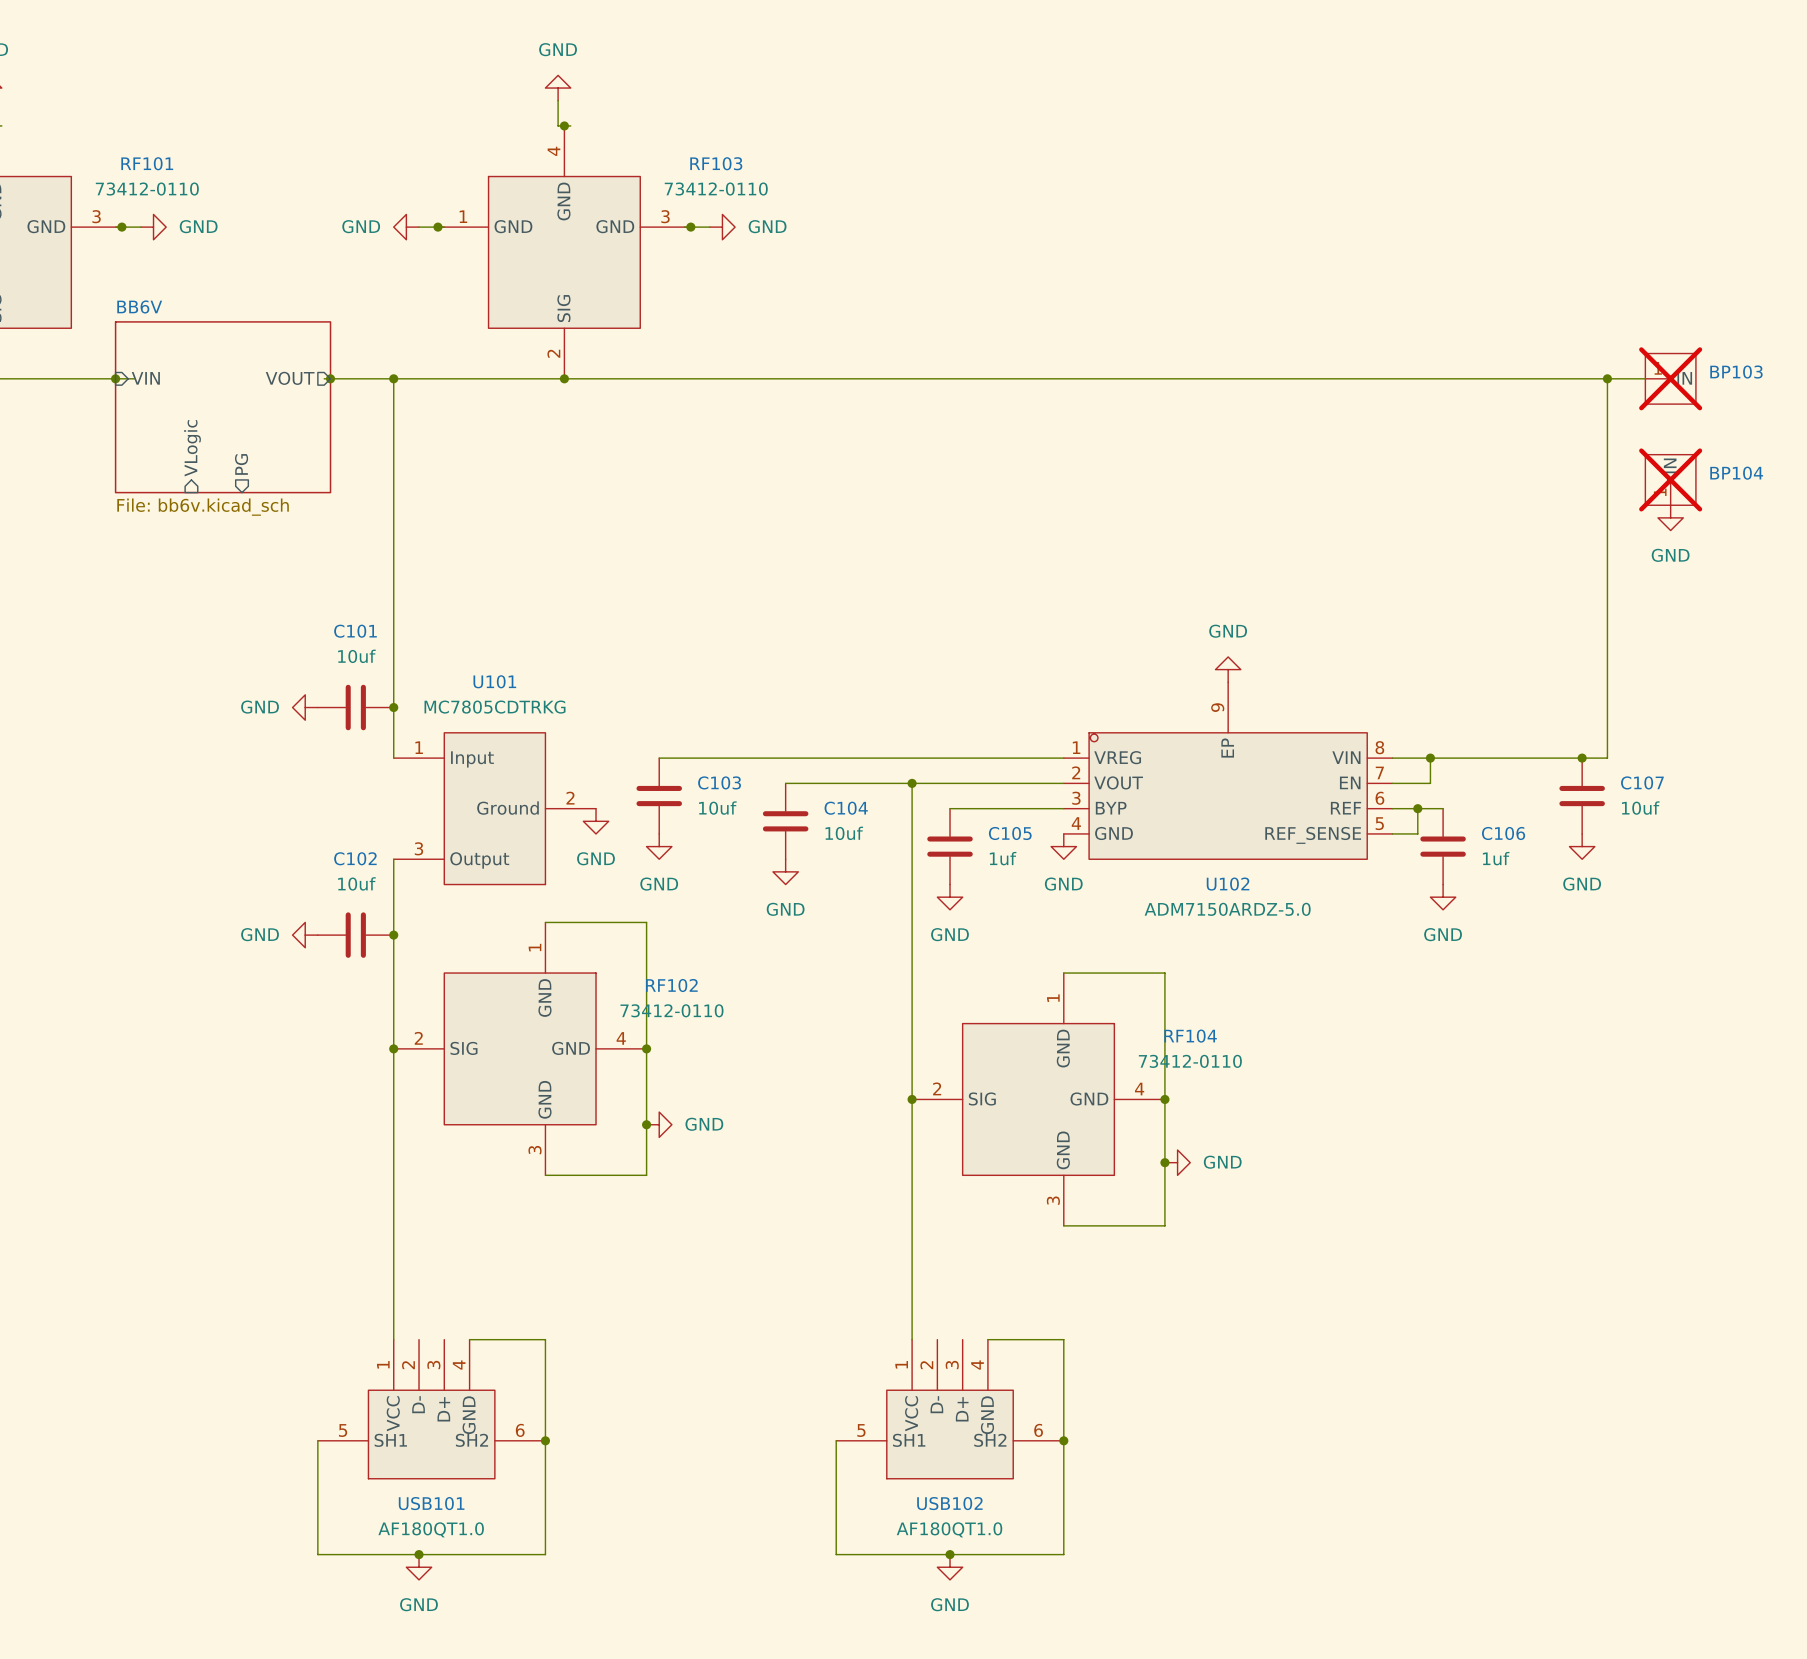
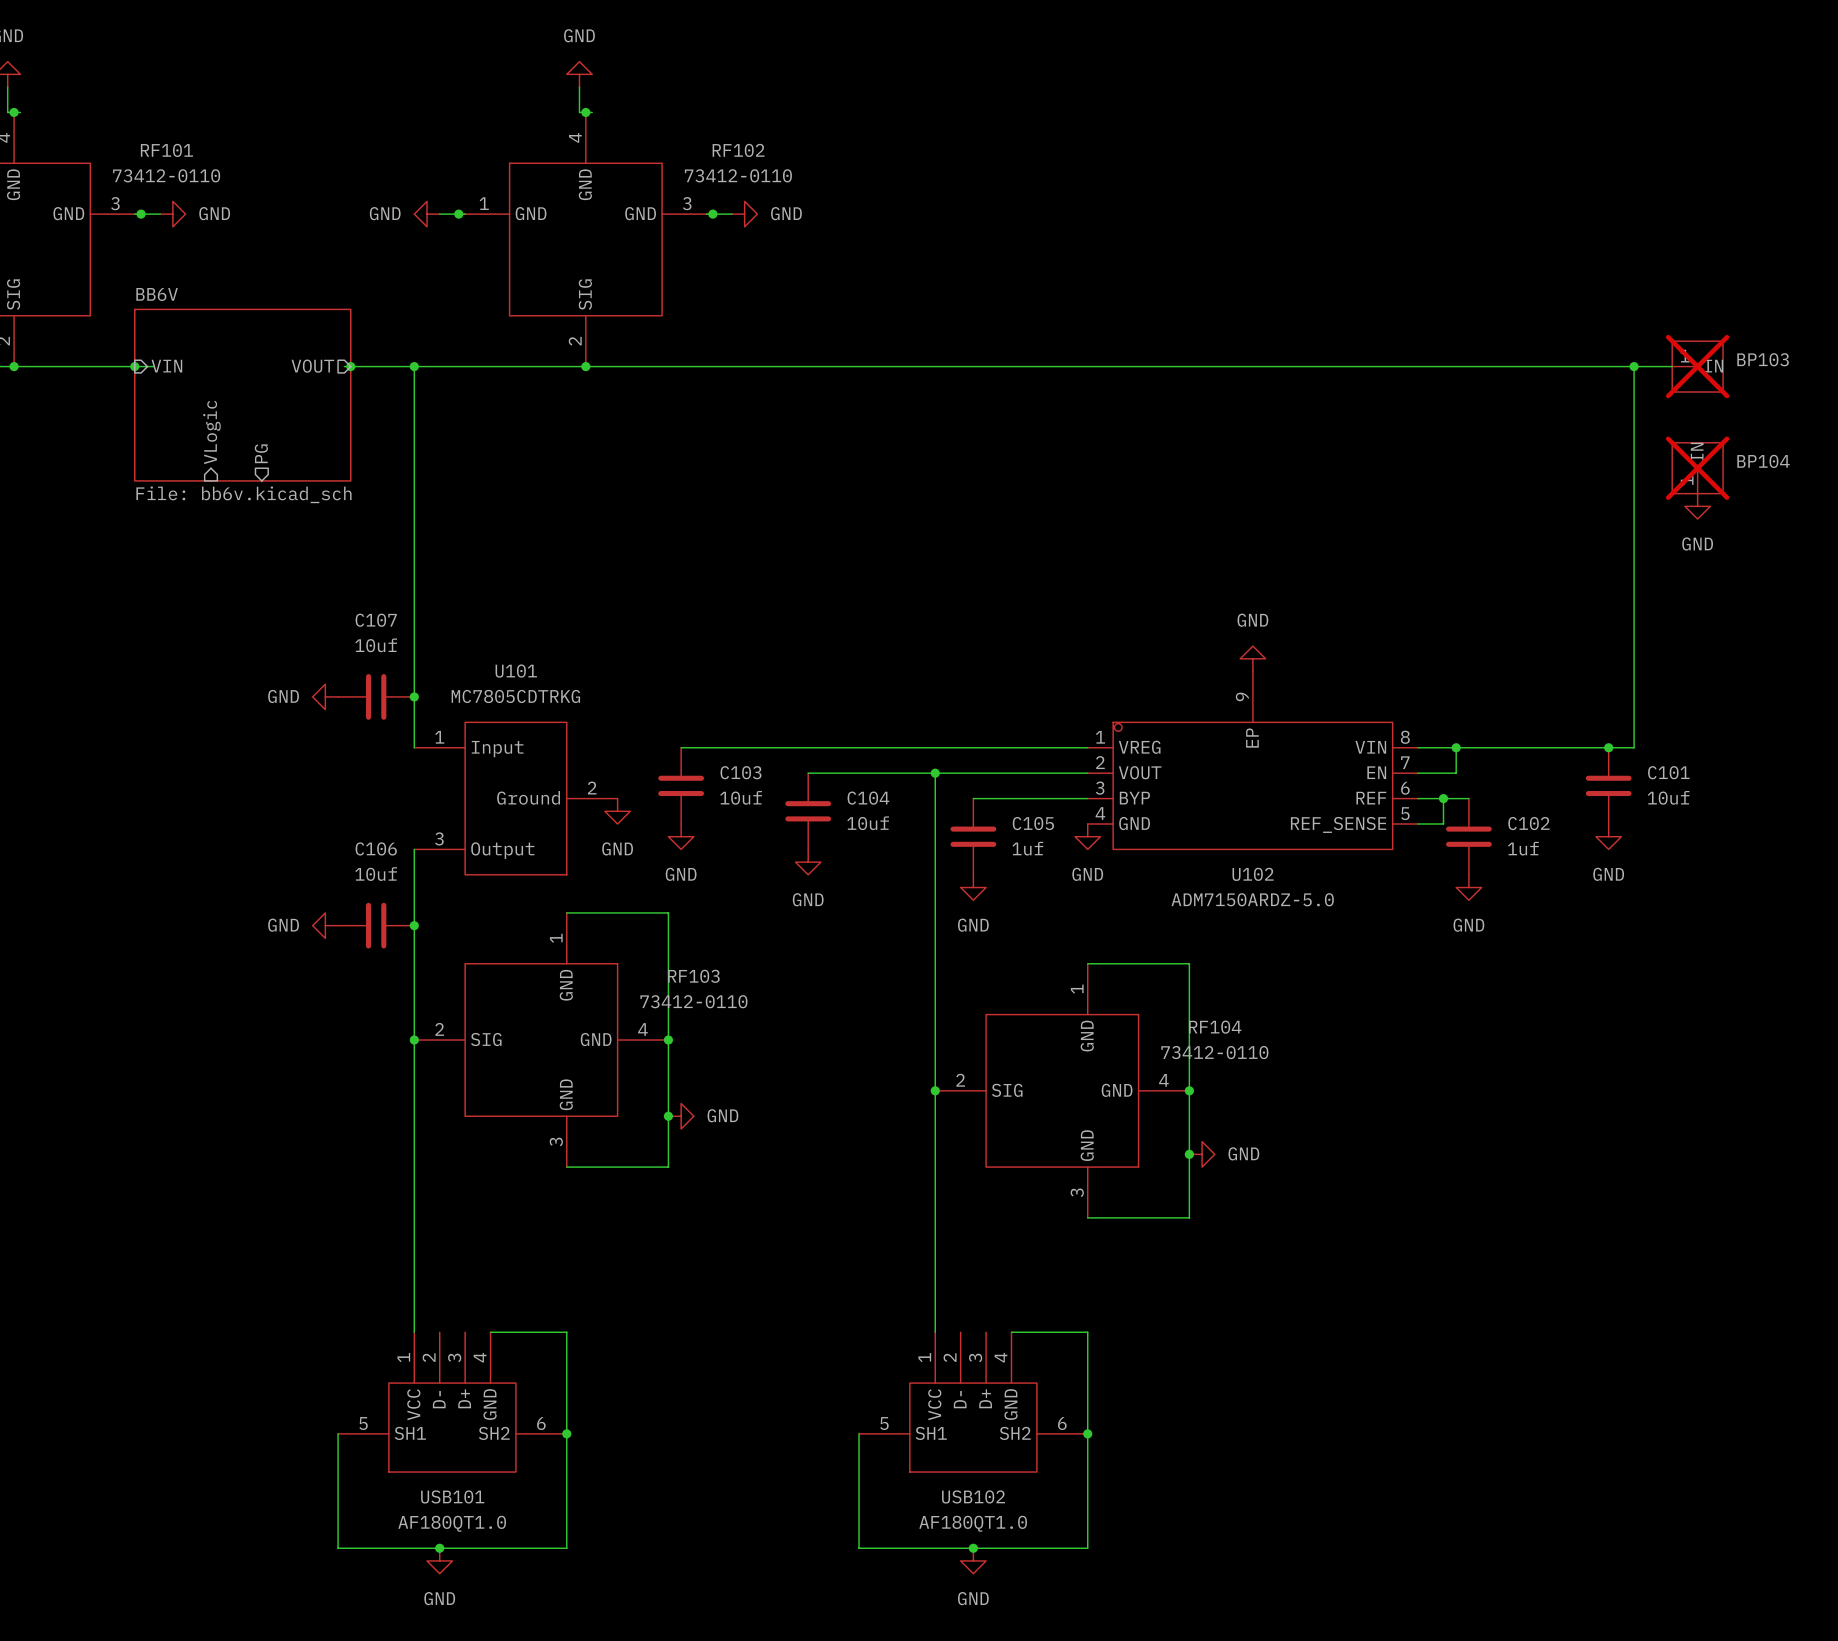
RF103 name: RF103 (716, 163) -> RF102 (738, 150)
C101 name: C101 (355, 631) -> C107 (376, 620)
C107 name: C107 (1642, 782) -> C101 (1668, 772)
C106 name: C106 (1503, 833) -> C102 (1528, 823)
C102 name: C102 (355, 858) -> C106 (376, 848)
RF102 name: RF102 (671, 985) -> RF103 (693, 976)

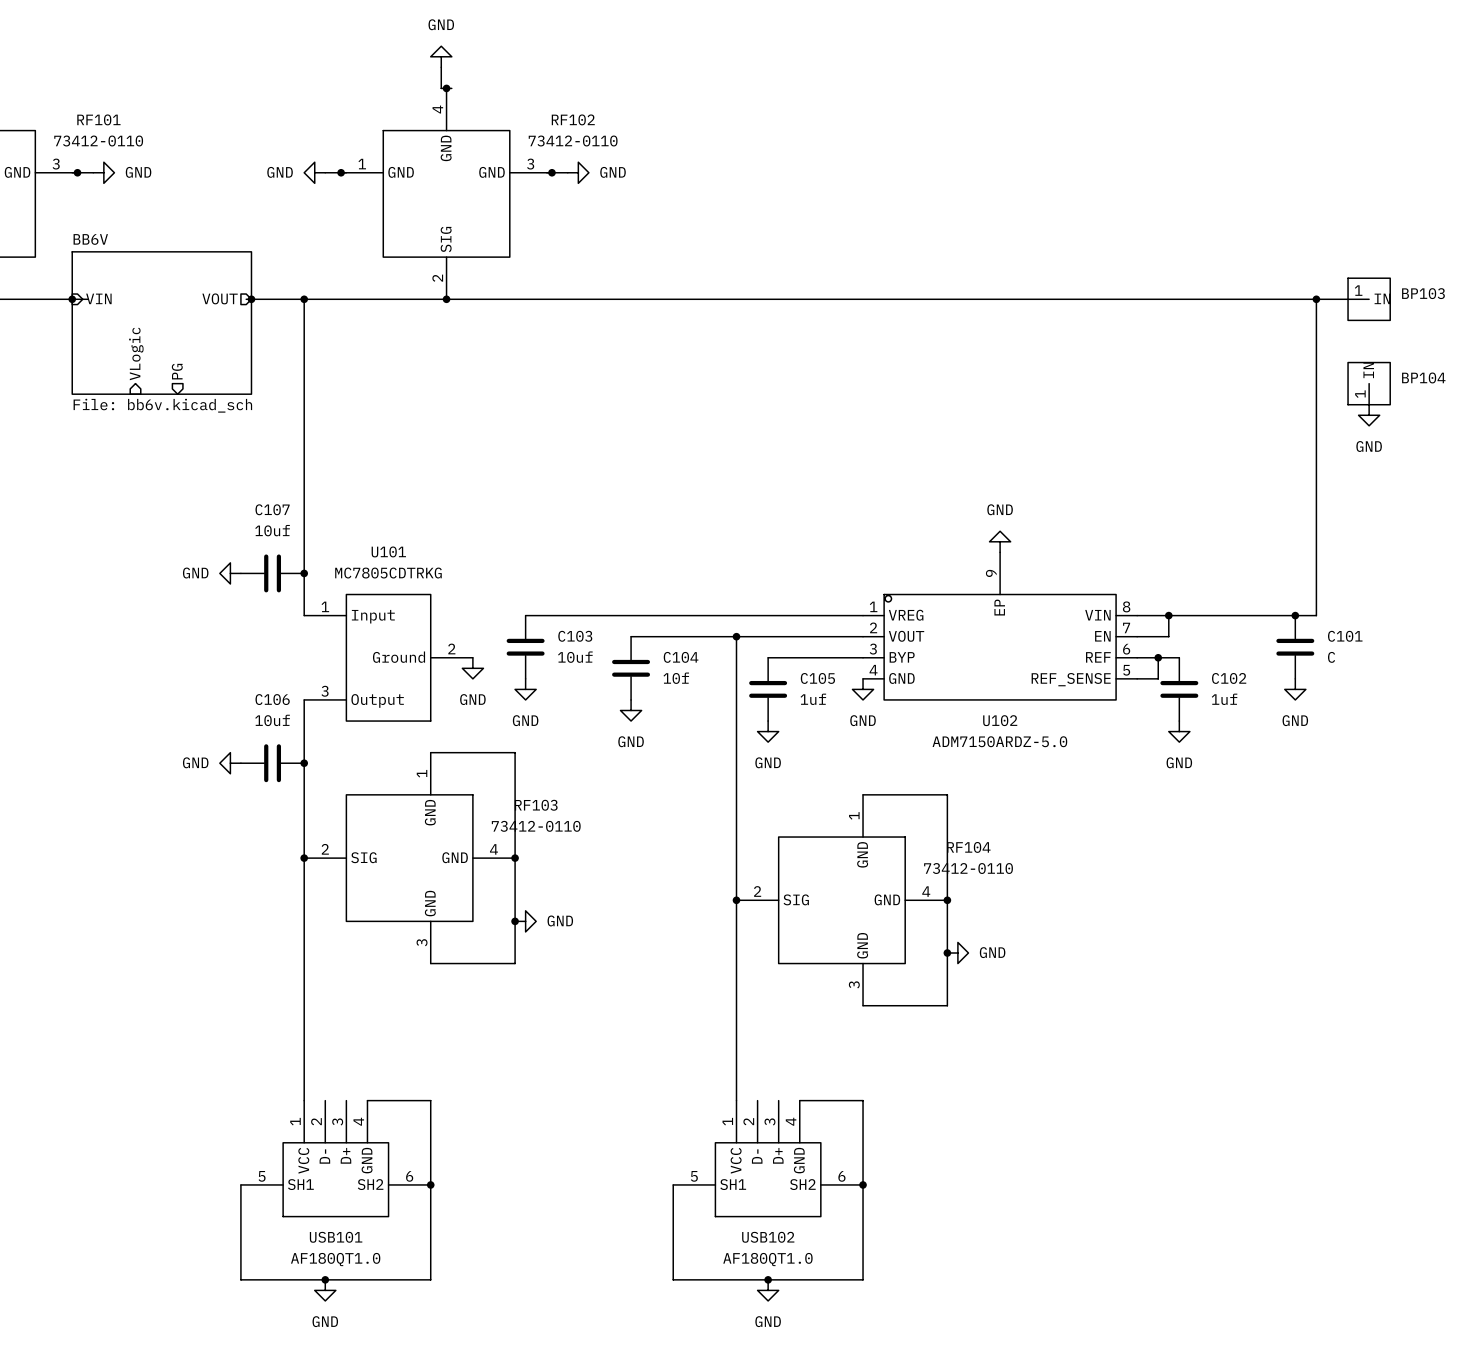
BP103 do-not-place cross: (1697, 366) -> none
BP104 do-not-place cross: (1697, 468) -> none
C101 value: 10uf (1668, 797) -> C (1331, 657)
C104 value: 10uf (868, 823) -> 10f (676, 678)

